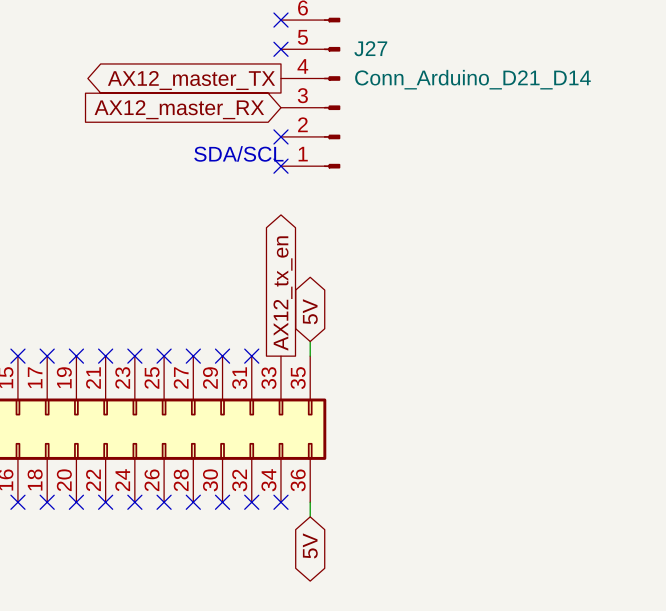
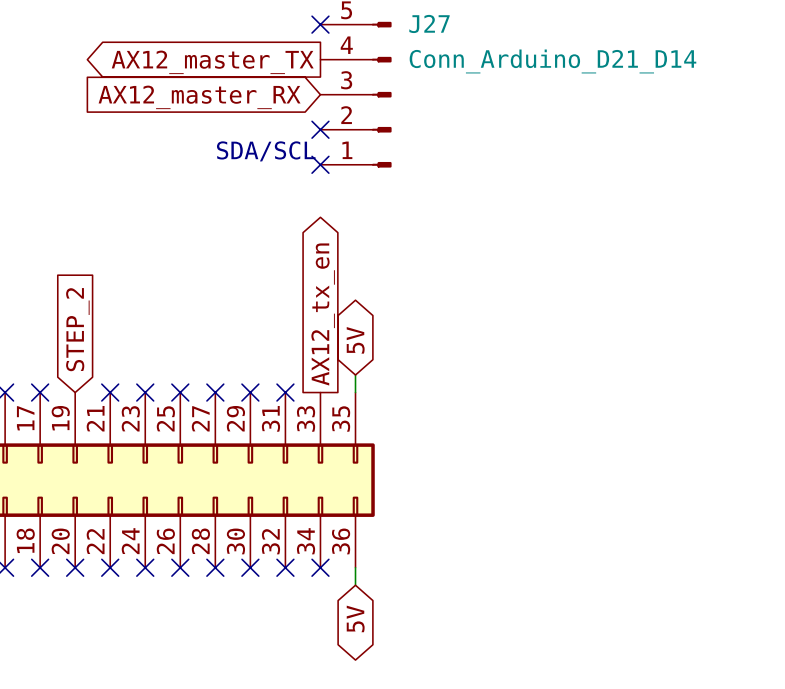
global label: none -> STEP_2 (77, 329)
no-connect mark: (76, 356) -> none

